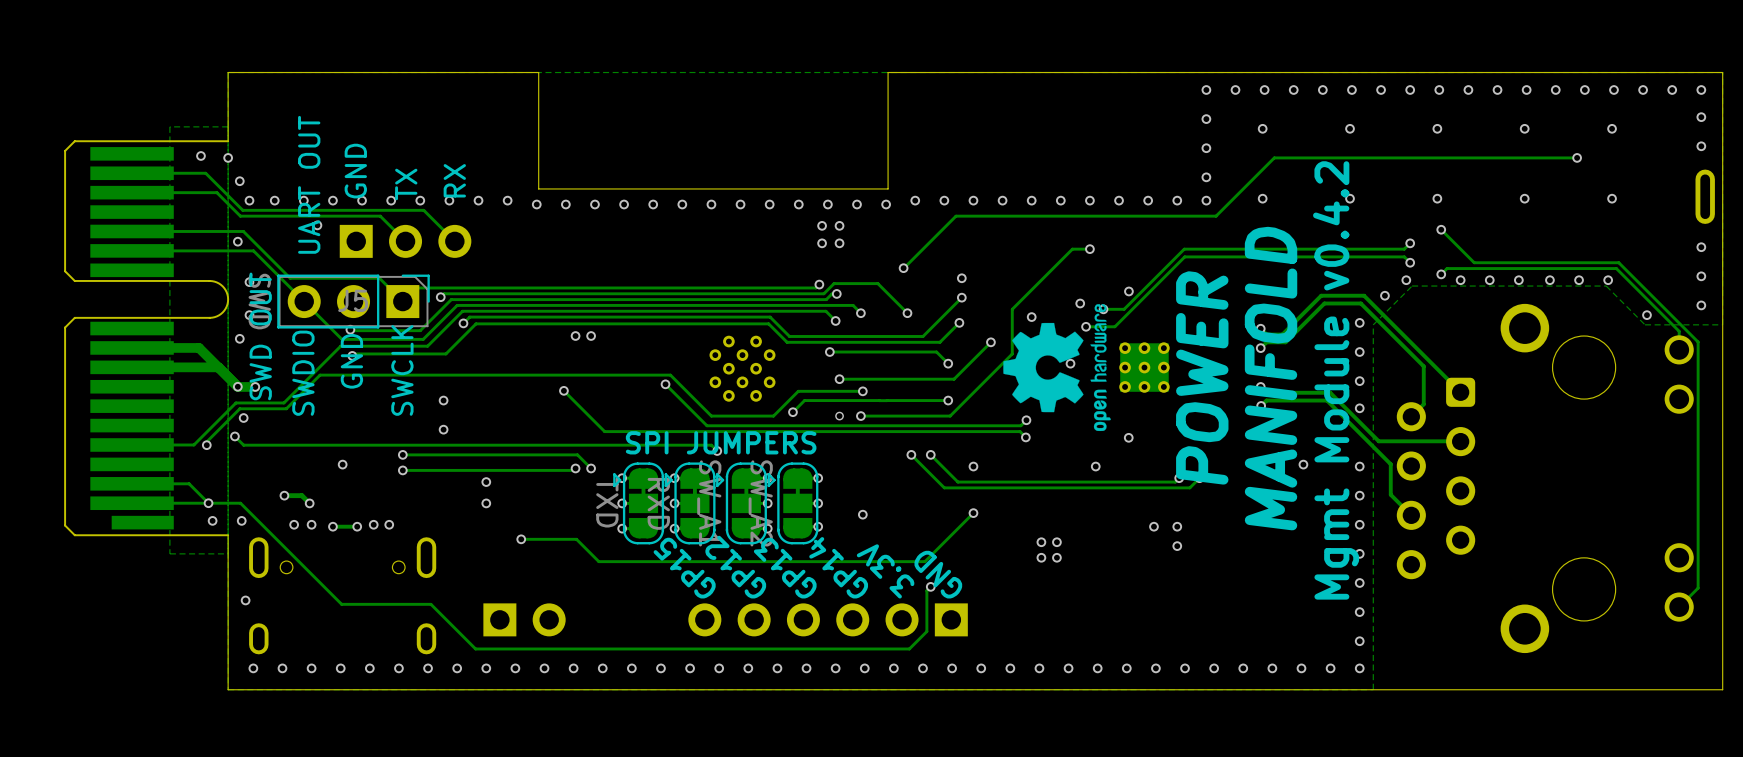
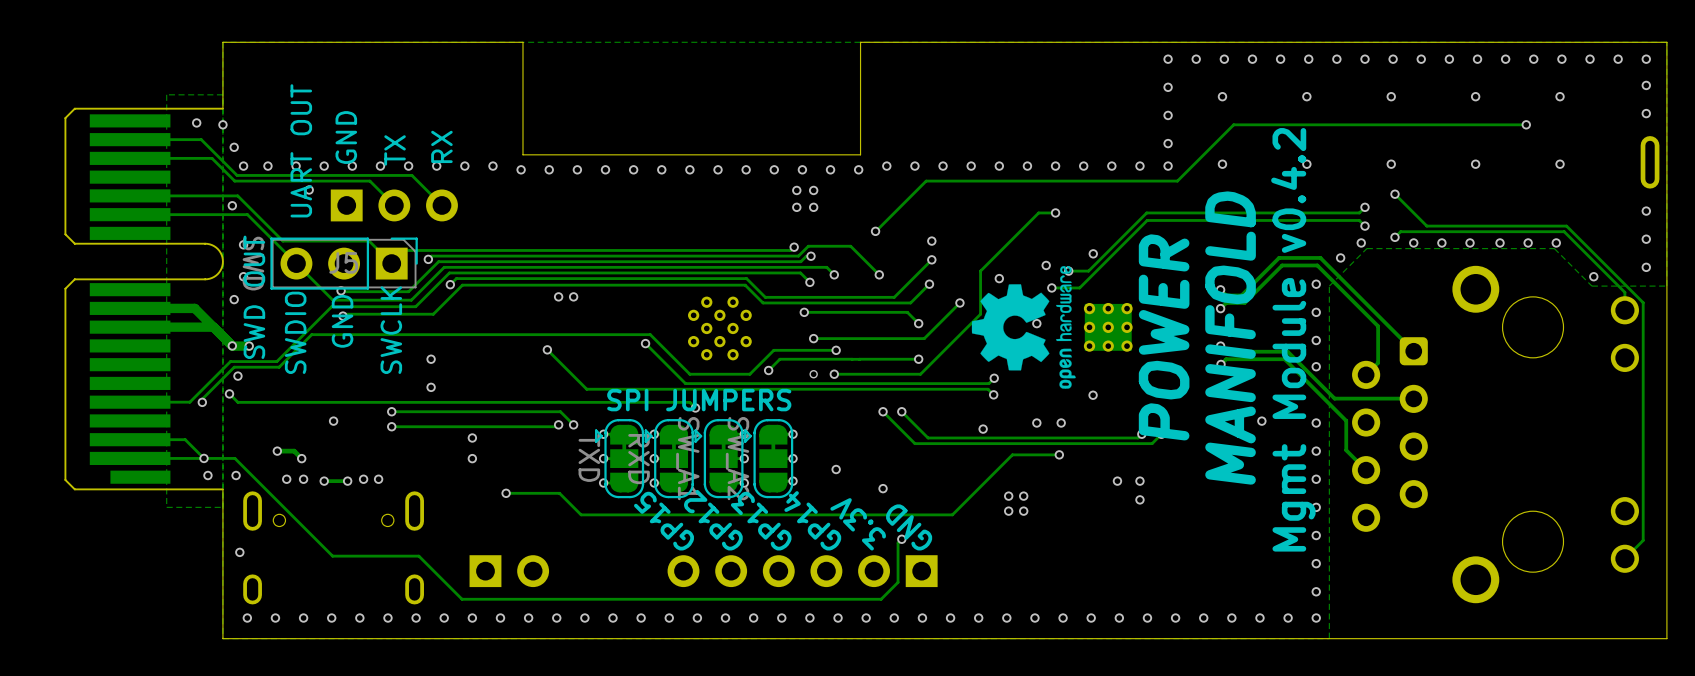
via: (973, 466) -> none
via: none -> (1036, 422)
via: none -> (983, 429)
via: none -> (1059, 454)
track: (973, 513) (924, 561) -> (1059, 454) (1012, 454) (952, 514) (896, 514)
via: (973, 513) -> none
via: none -> (883, 488)

